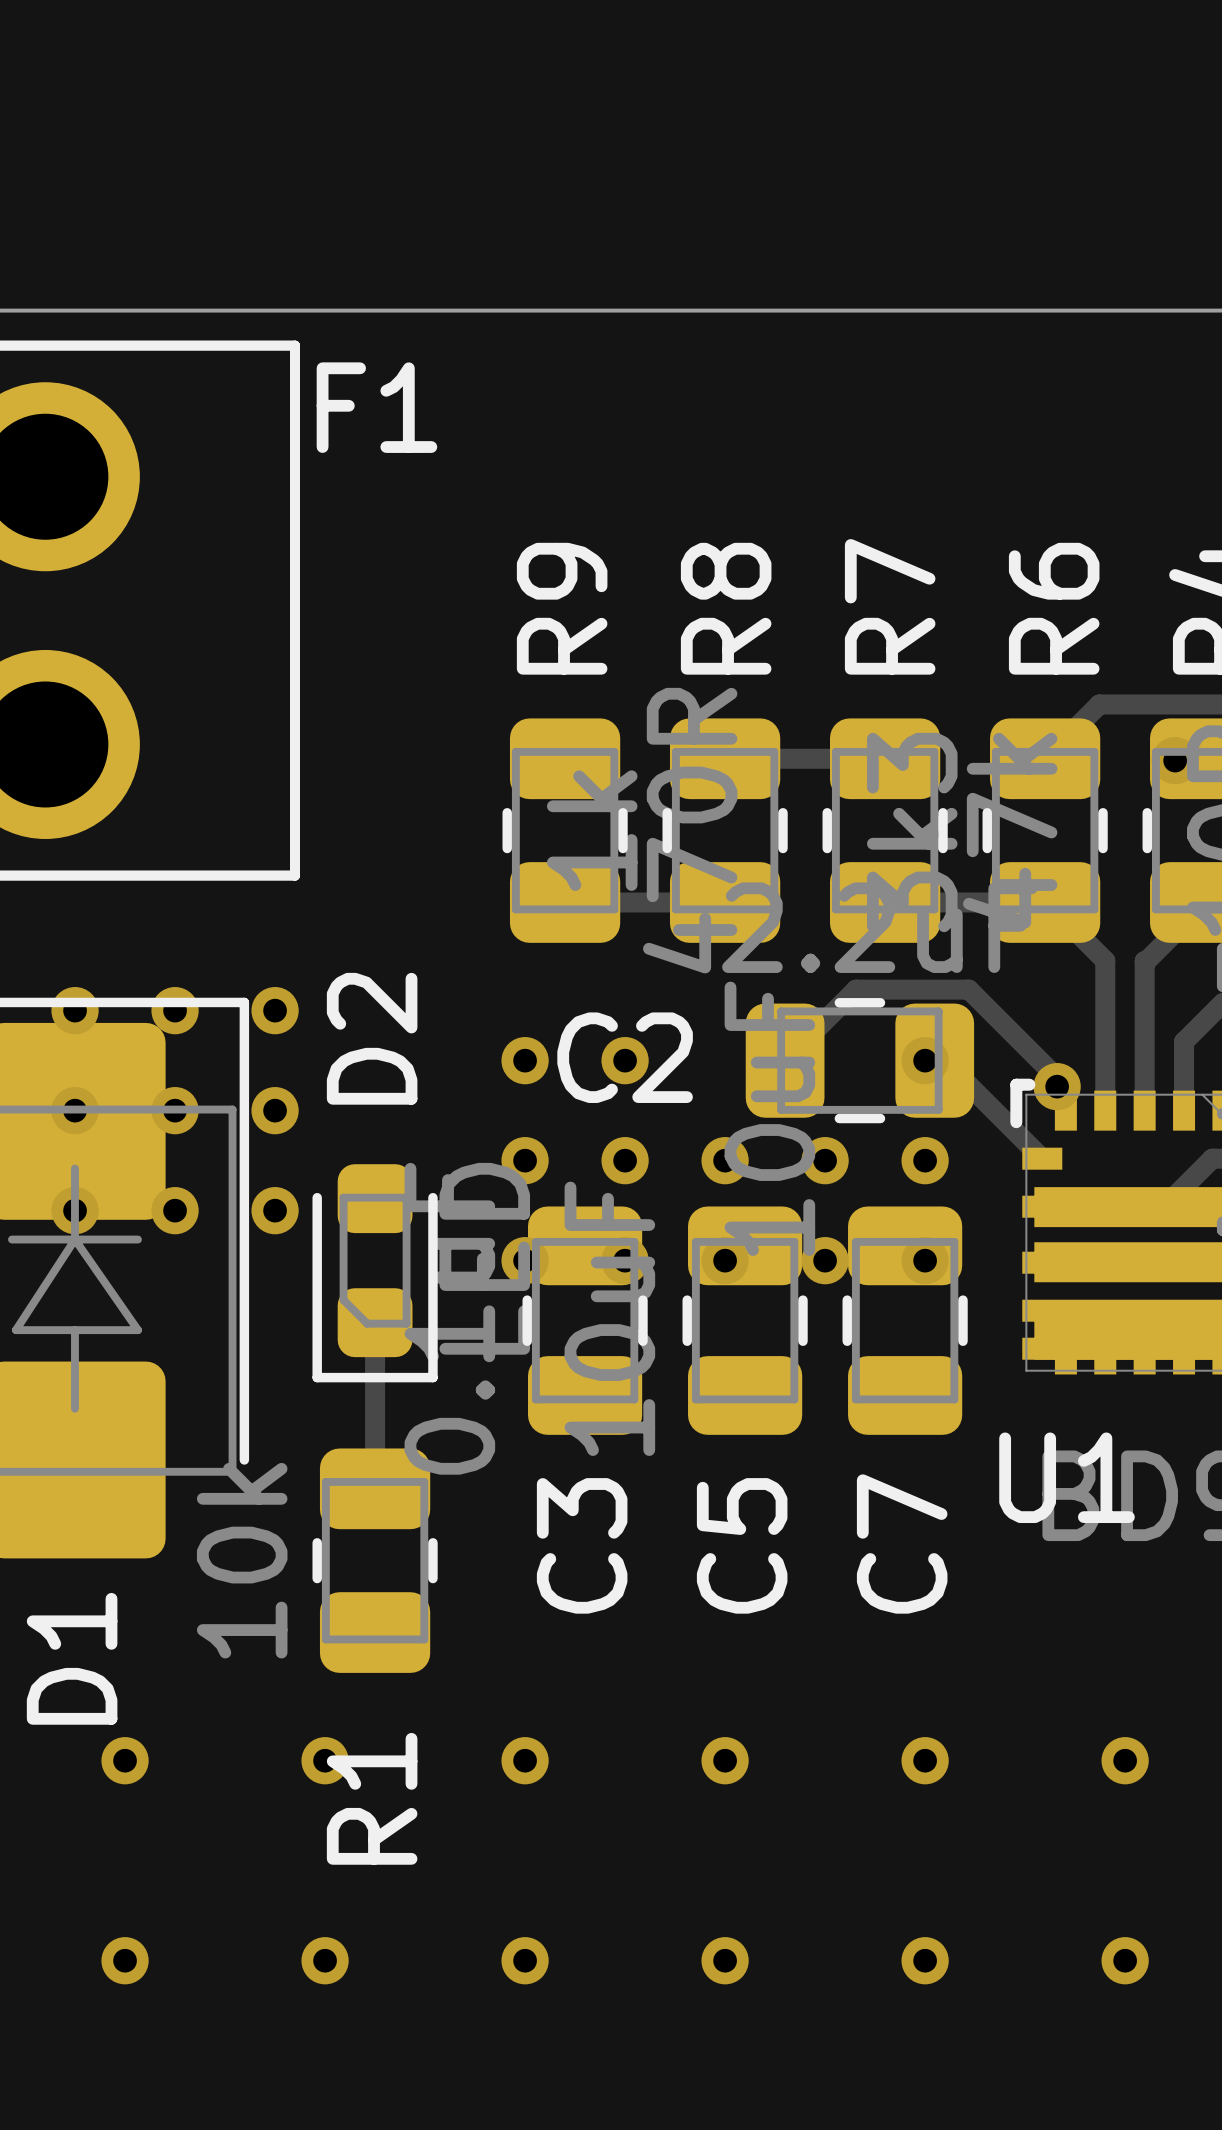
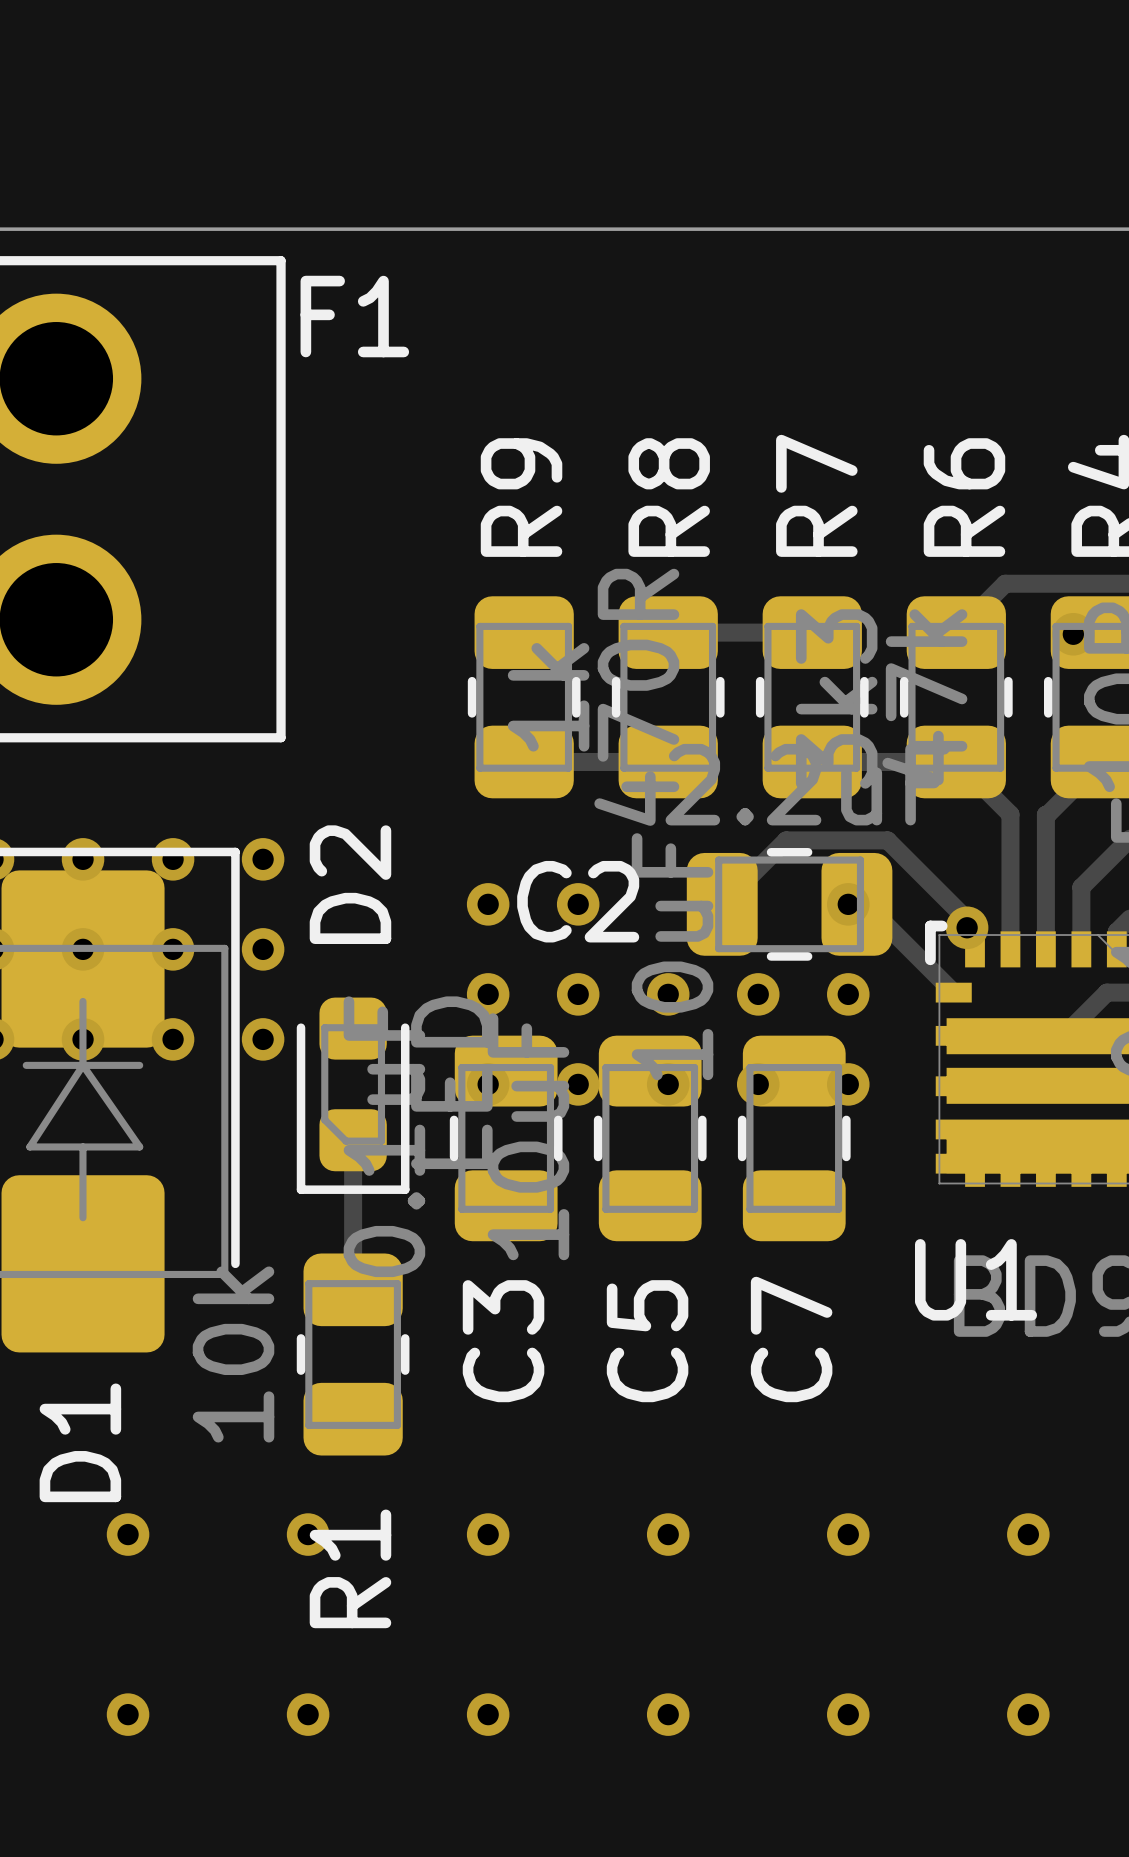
C3 position: (585, 1320) -> (506, 1138)
C5 position: (745, 1320) -> (650, 1138)
C7 position: (905, 1320) -> (794, 1138)

